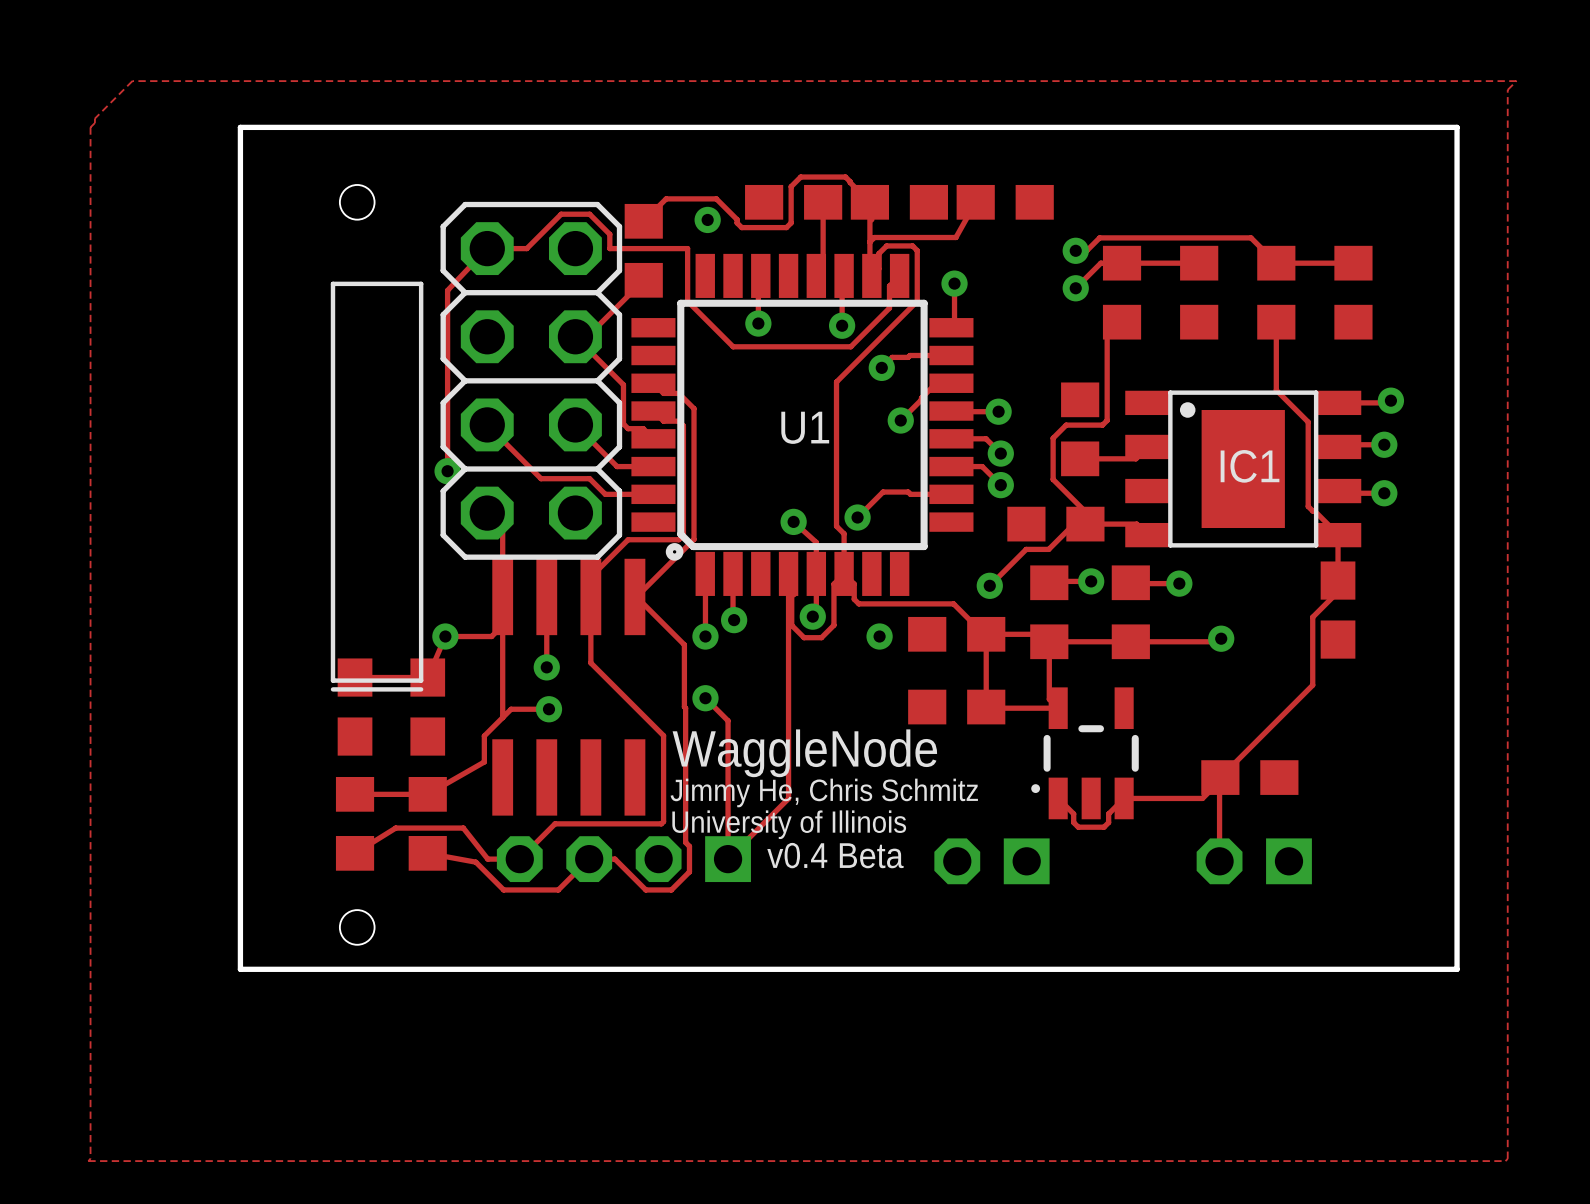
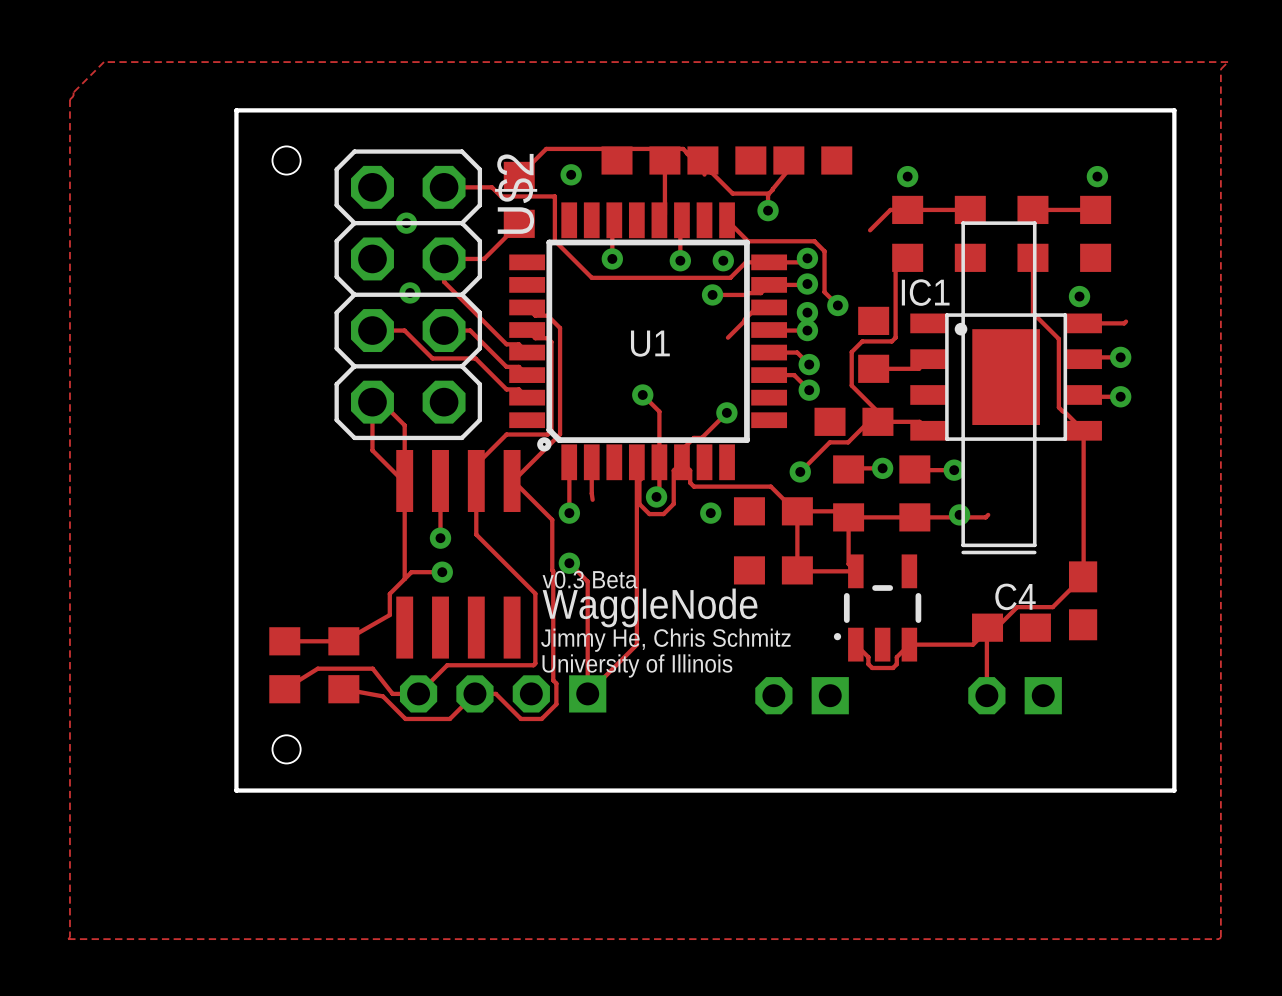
board edge: (240, 127) (240, 969) (1457, 969) (1457, 127) (240, 127) -> (236, 110) (236, 790) (1174, 790) (1174, 110) (236, 110)
track: (666, 198) (716, 198) (737, 219) (737, 222) (741, 227) (786, 227) (791, 222) (791, 186) (800, 177) (845, 177) (869, 202) (869, 273) (871, 275) (878, 268) (878, 253) (886, 245) (912, 245) (917, 250) (917, 301) (836, 382) (836, 526) (844, 533) (844, 558) -> (537, 157) (546, 148) (683, 148) (702, 169) (712, 173) (732, 193) (769, 193)
track: (975, 202) (955, 237) (874, 237) (869, 241) -> none
track: none -> (788, 169) (768, 194) (768, 210)
via: none -> (907, 176)
via: none -> (1097, 176)
U$2 name: none -> U$2 (516, 193)
track: (687, 248) (609, 248) (609, 234) (589, 214) (561, 214) (526, 248) (487, 248) (447, 290) (447, 471) -> (554, 198) (554, 196) (501, 196) (491, 187) (444, 187)
track: (1075, 250) (1086, 250) (1099, 237) (1251, 237) (1276, 263) -> none
via: (1075, 250) -> none
track: (899, 275) (889, 286) (889, 308) (850, 346) -> (807, 258) (803, 262) (745, 262) (730, 277) (687, 277)
track: none -> (727, 220) (748, 241) (814, 241) (824, 251) (824, 292) (837, 305)
via: none -> (406, 223)
track: (954, 283) (954, 324) (951, 327) -> none
via position: (954, 283) -> (768, 210)
via: (1075, 288) -> none
via: none -> (807, 258)
track: (600, 323) (587, 336) (575, 336) (623, 384) (623, 424) -> (484, 258) (444, 258) (444, 281) (502, 340)
via: none -> (723, 260)
track: none -> (807, 284) (769, 284) (760, 293) (721, 294)
via: none -> (807, 284)
track: (951, 355) (892, 357) (881, 367) -> none
via: none -> (410, 292)
U$2 position: (531, 380) -> (408, 294)
via: none -> (837, 305)
via: none -> (807, 312)
via position: (1390, 400) -> (1079, 296)
via: (900, 420) -> none
track: (487, 424) (541, 478) (589, 478) (605, 494) (653, 494) -> (372, 330) (404, 330) (432, 358) (475, 358) (506, 389) (518, 389) (527, 397)
track: (575, 424) (617, 466) (653, 466) -> (444, 330) (470, 330) (506, 366) (518, 366) (527, 375)
IC1 name position: IC1 (1250, 466) -> IC1 (925, 292)
via: (447, 471) -> none
part position: (377, 486) -> (998, 387)
track: (951, 494) (883, 492) (857, 517) -> none
track: none -> (372, 402) (372, 450) (404, 482)
track: none -> (726, 412) (701, 437) (693, 437) (681, 449)
via: none -> (726, 412)
via: (857, 517) -> none
track: (793, 521) (816, 542) -> (642, 394) (659, 411) (659, 436)
via position: (793, 521) -> (642, 394)
track: (1338, 535) (1338, 591) (1312, 617) (1312, 685) (1220, 777) -> (1083, 430) (1083, 576) (1052, 607) (1017, 607) (996, 627)
part position: (1338, 610) -> (1083, 600)
via: (734, 620) -> none
track: (502, 625) (491, 636) (445, 636) (427, 677) (355, 677) -> none
via: (445, 636) -> none
via position: (1221, 638) -> (959, 514)
part: (355, 707) -> none
part: (427, 707) -> none
text: none -> v0.3 Beta (590, 579)
C4 name: none -> C4 (1015, 596)
text: v0.4 Beta (835, 855) -> none

